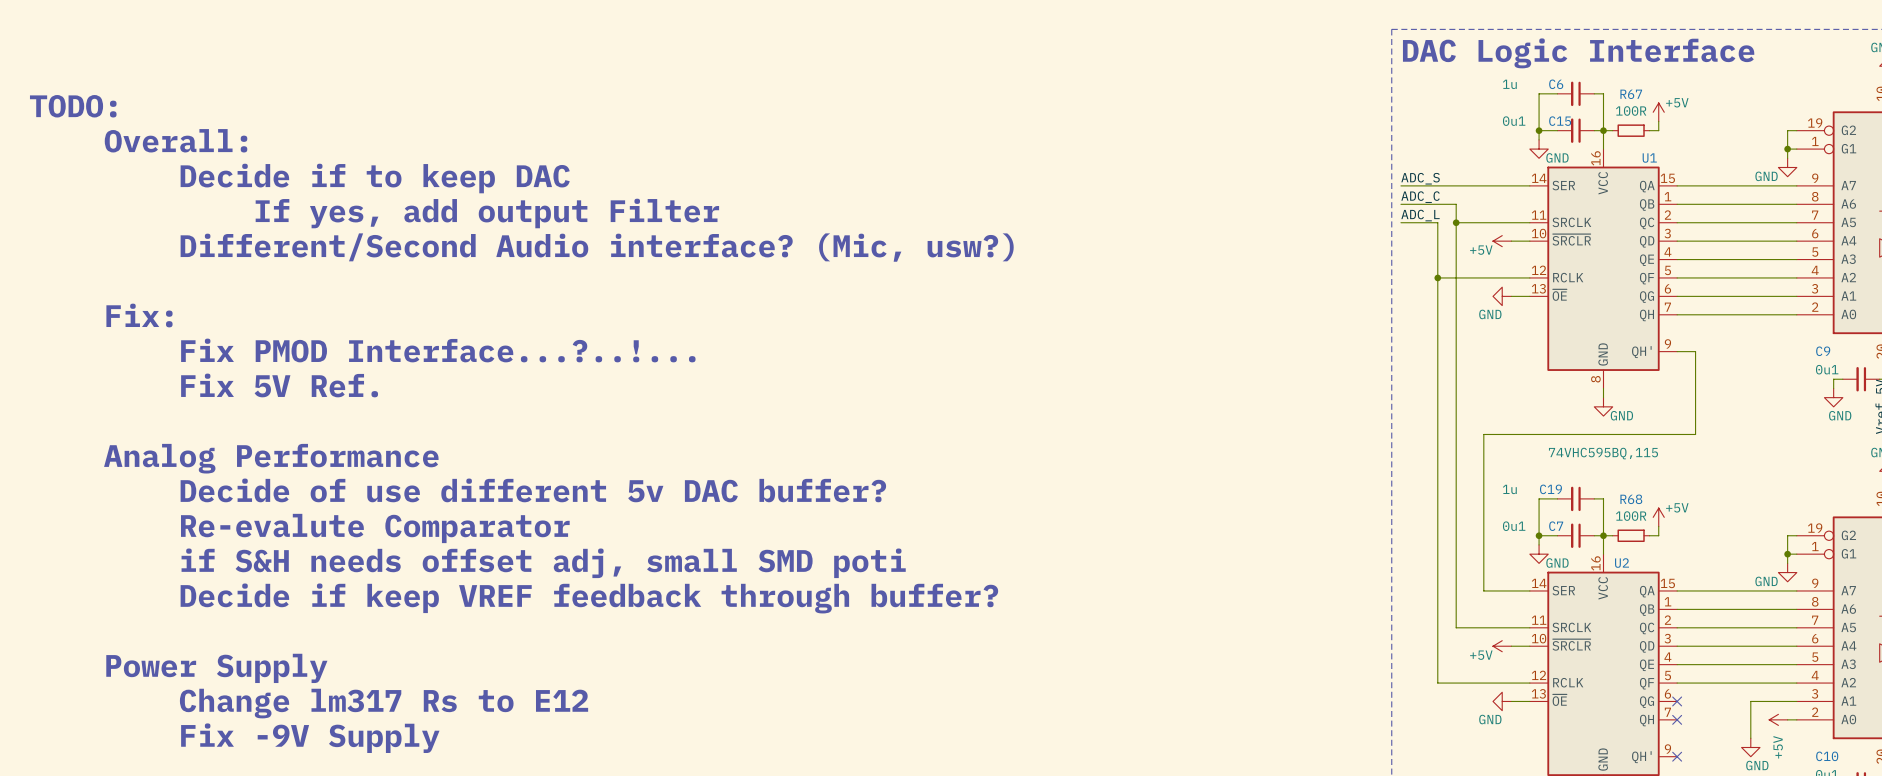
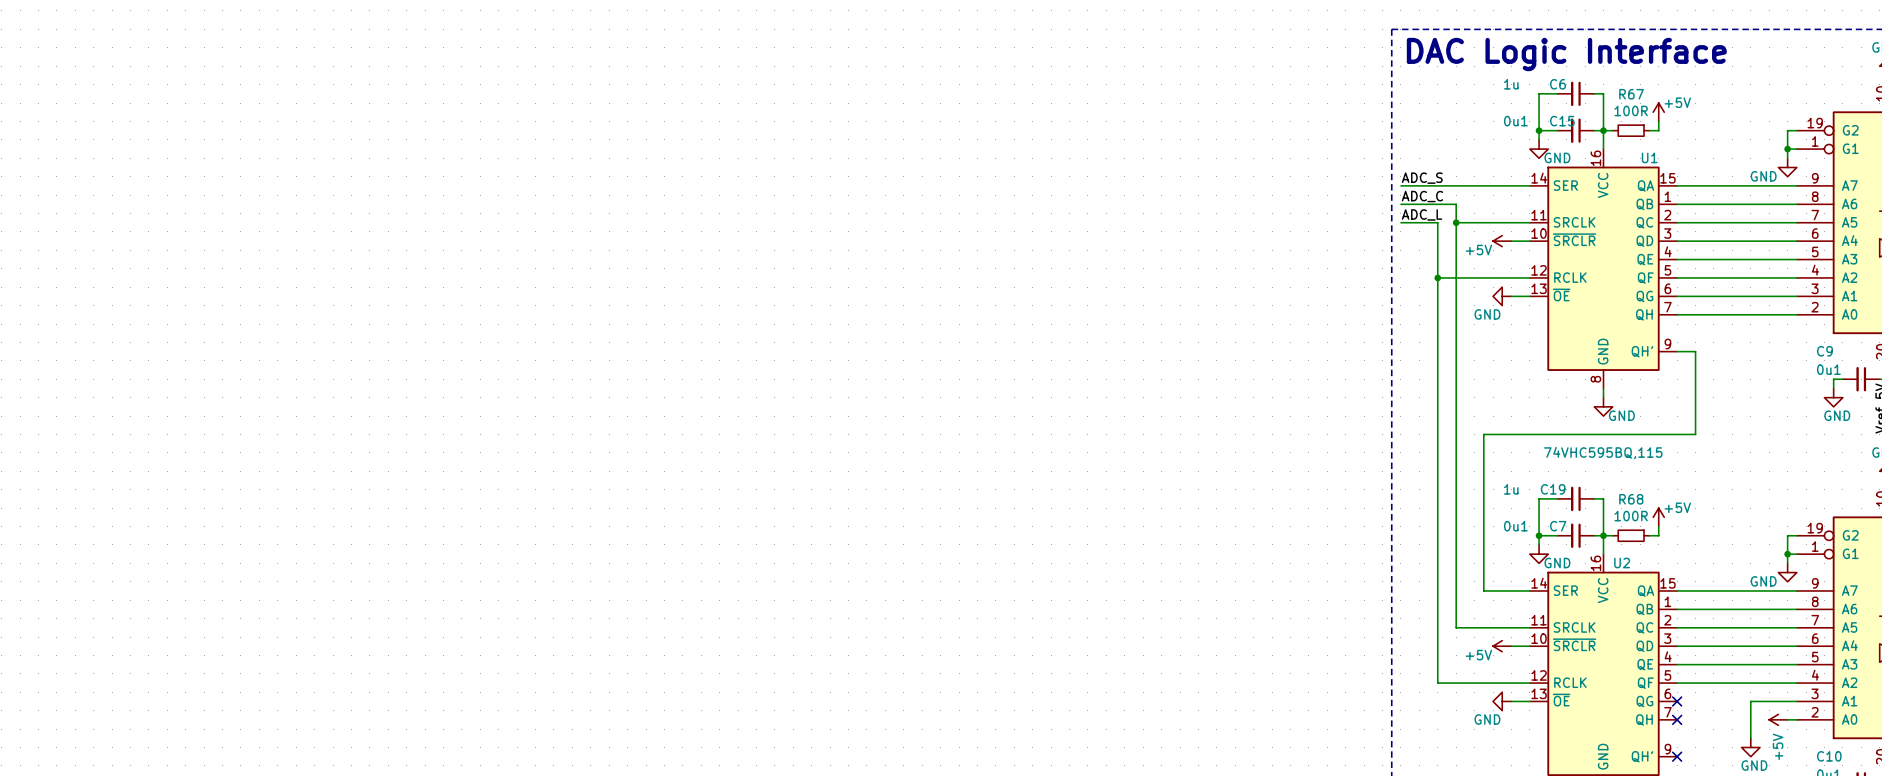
text: TODO: (73, 106) -> none
text: Overall: (176, 140) -> none
text: Decide if to keep DAC (375, 178) -> none
text: If yes, add output Filter (487, 213) -> none
text: Different/Second Audio interface? (Mic, usw?) (597, 247) -> none
text: Fix: (139, 315) -> none
text: Fix PMOD Interface...?..!... (438, 350) -> none
text: Fix 5V Ref. (279, 385) -> none
text: Analog Performance (271, 458) -> none
text: Decide of use different 5v DAC buffer? (533, 490) -> none
text: Re-evalute Comparator (375, 528) -> none
text: if S&H needs offset adj, small SMD poti (543, 563) -> none
text: Decide if keep VREF feedback through buffer? (589, 598) -> none
text: Power Supply (216, 668) -> none
text: Change lm317 Rs to E12 (384, 703) -> none
text: Fix -9V Supply (310, 738) -> none

